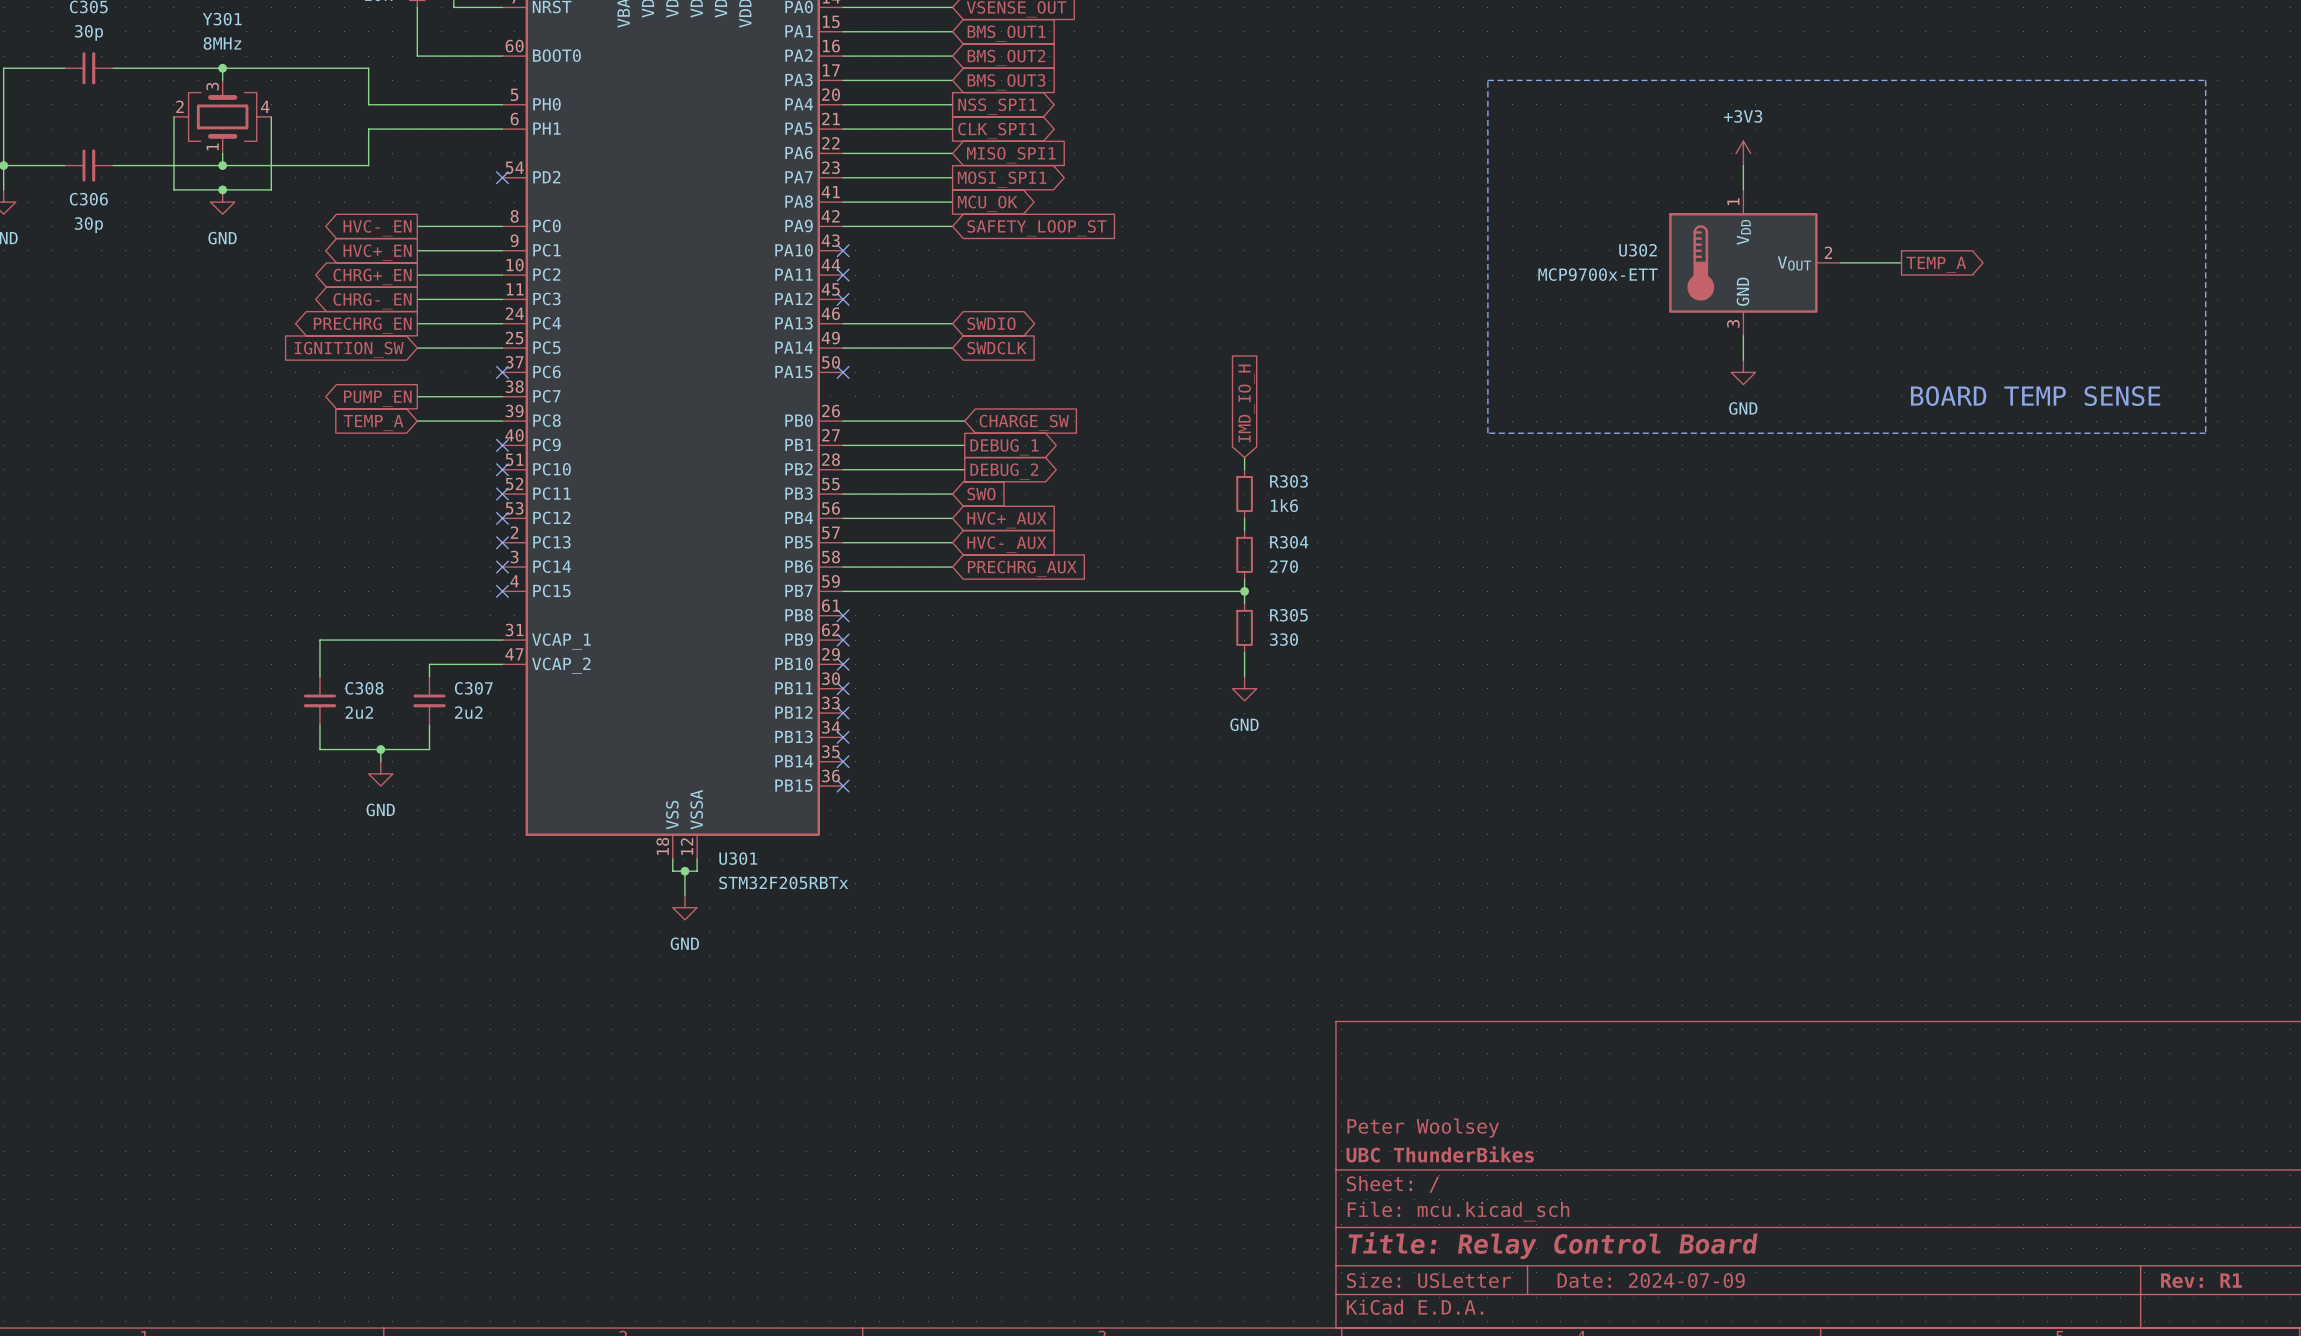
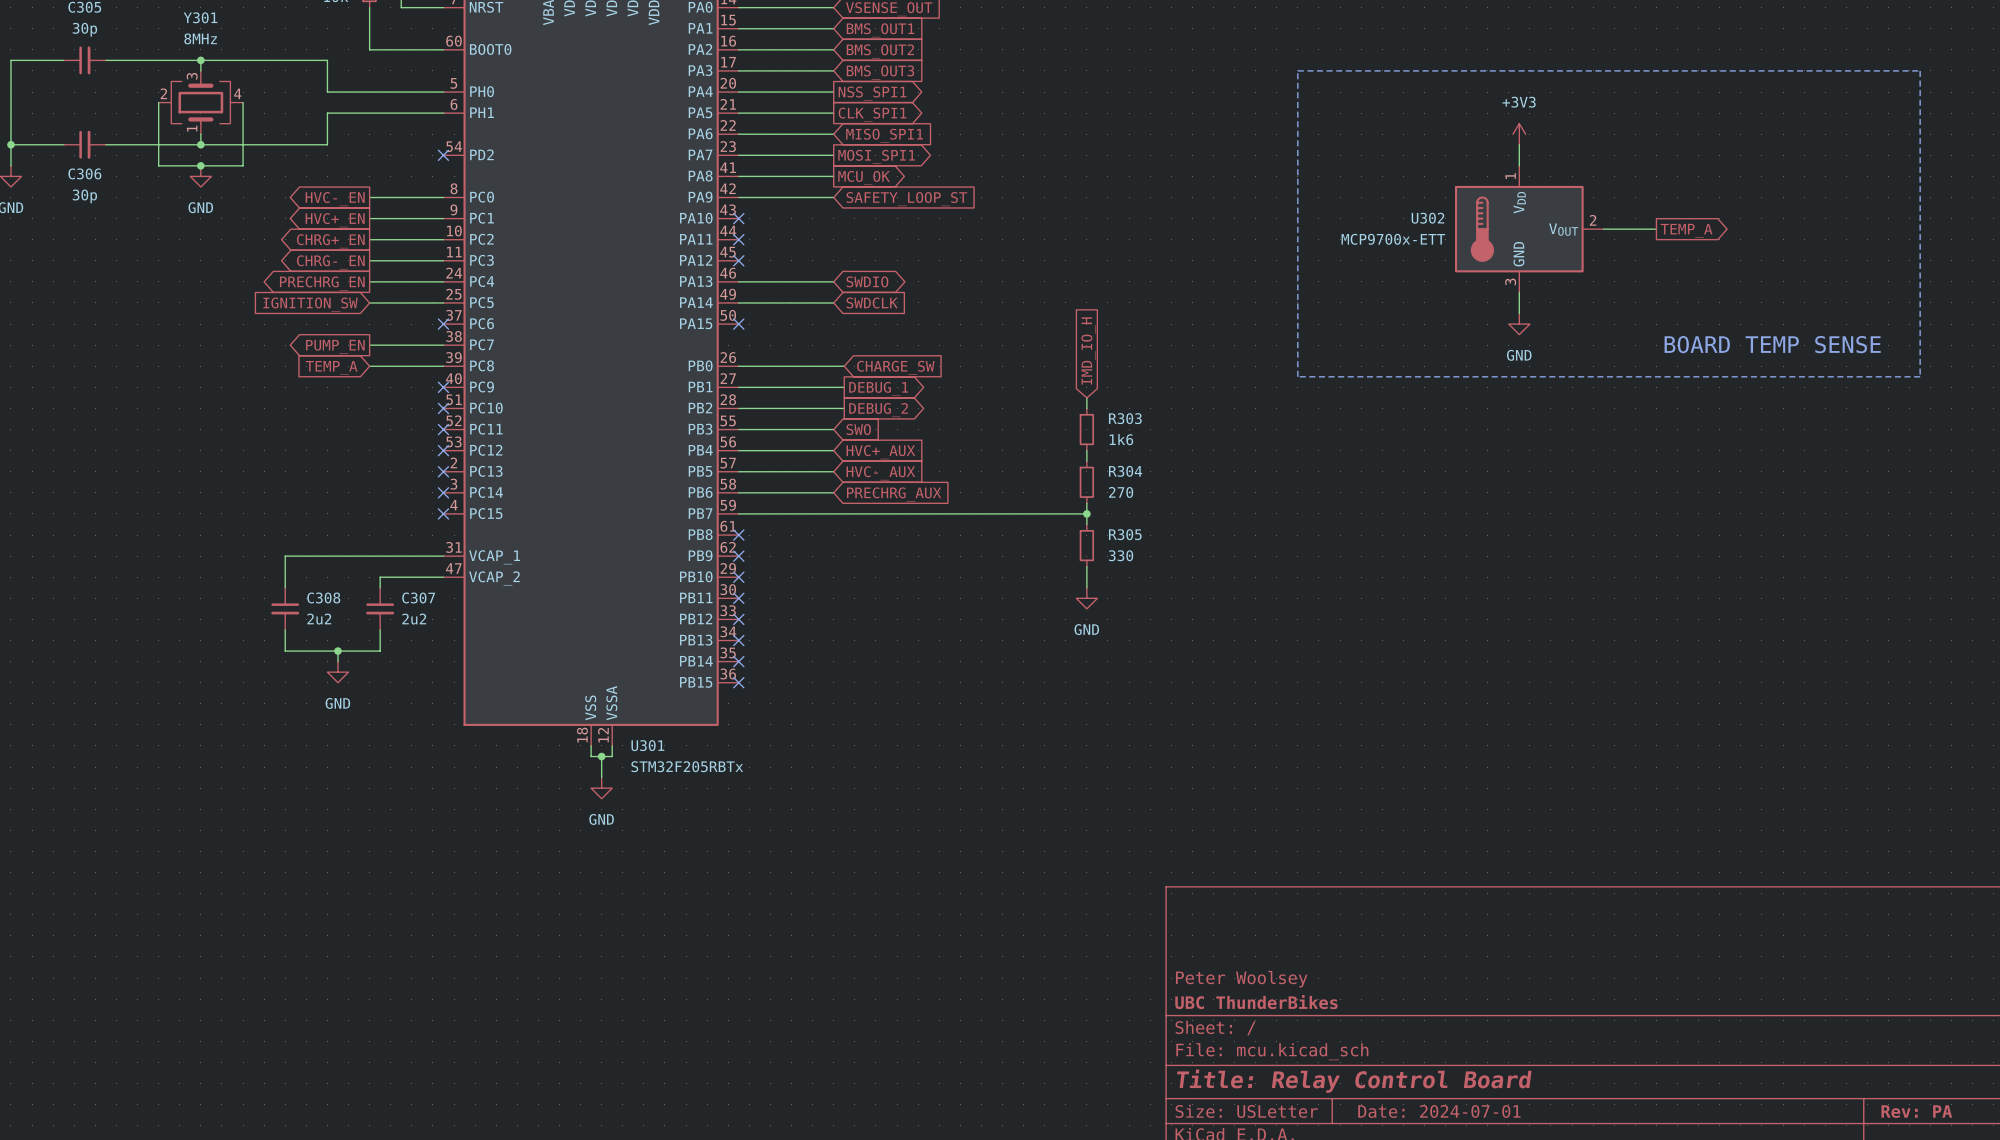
title block: Date: 2024-07-09 (1651, 1280) -> Date: 2024-07-01 (1439, 1111)
title block: Rev: R1 (2201, 1280) -> Rev: PA (1916, 1111)

